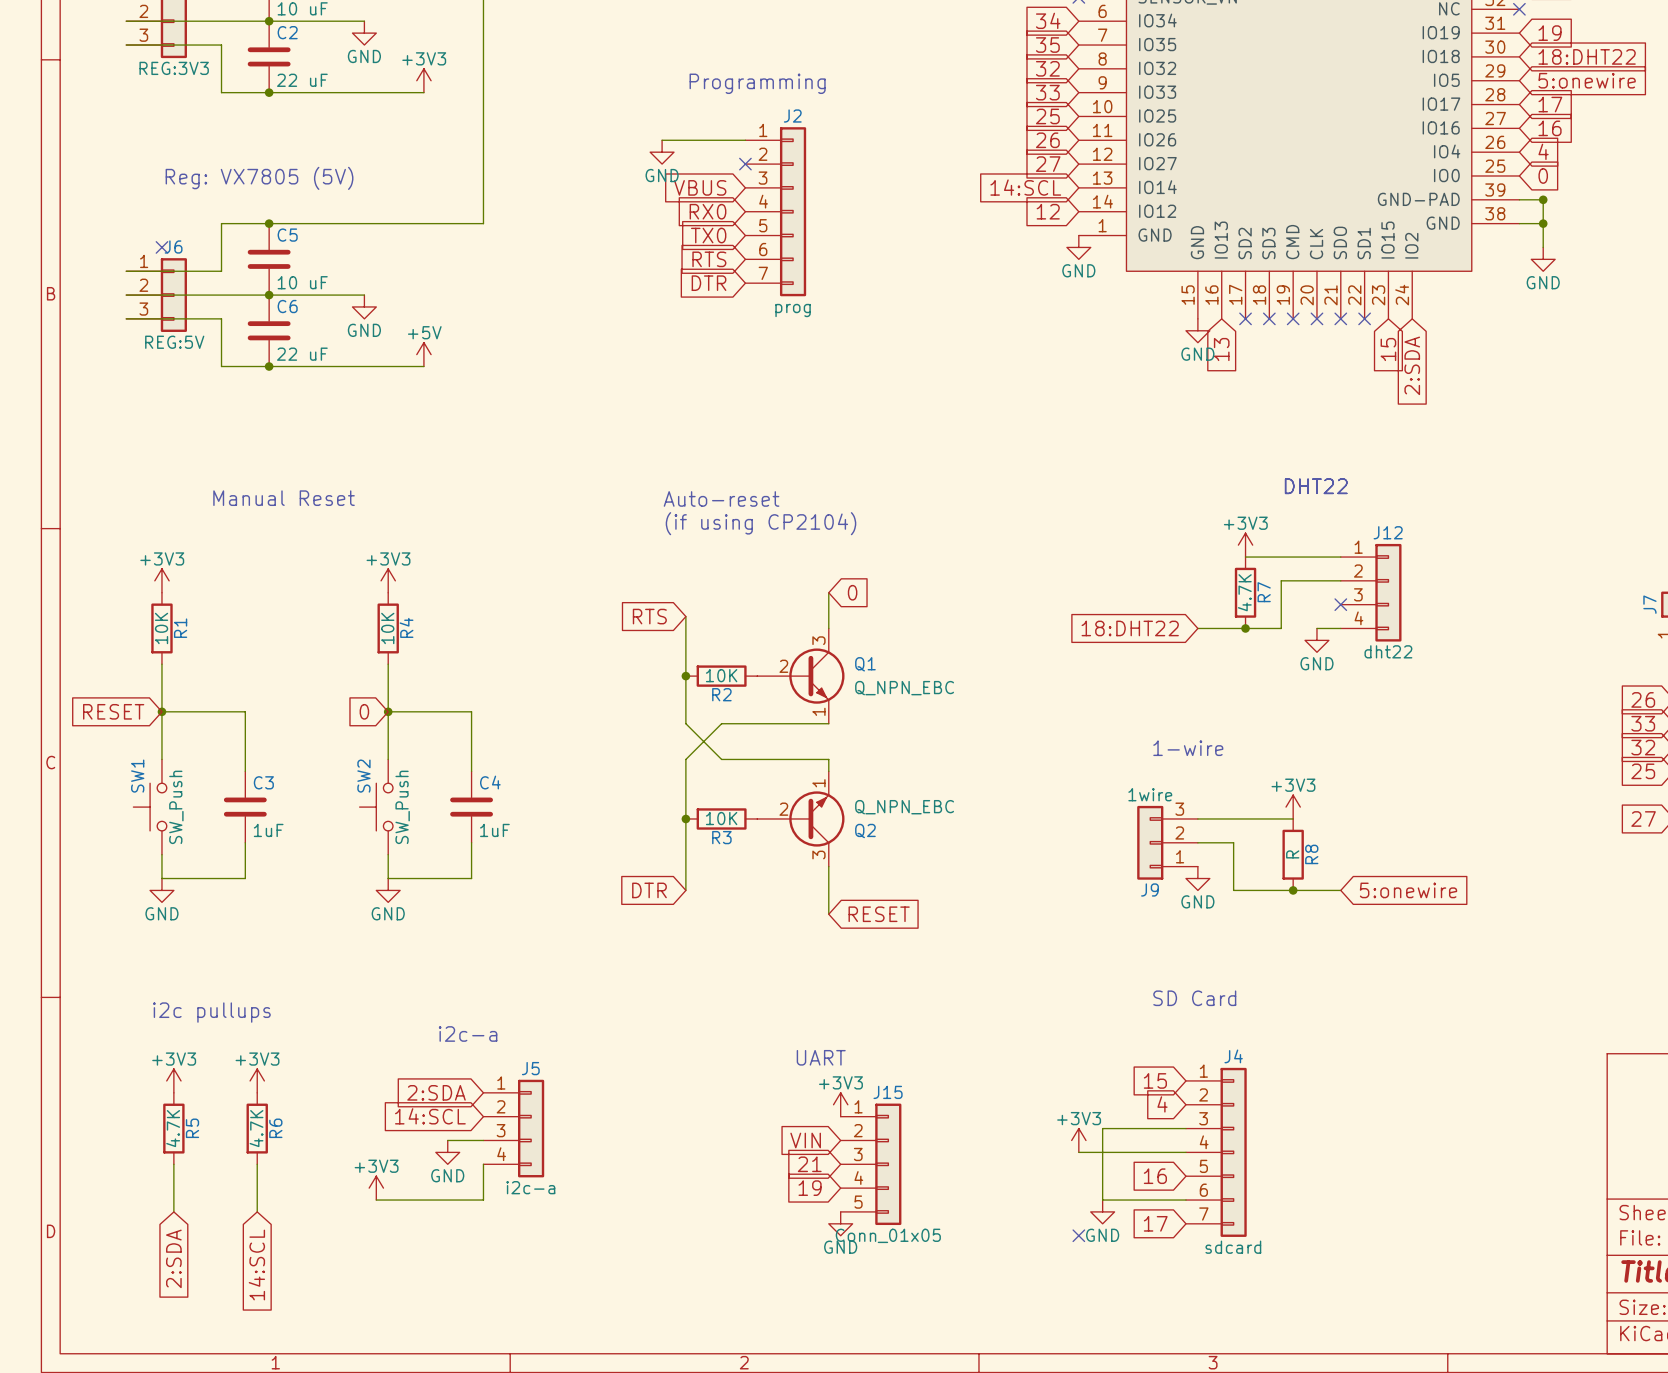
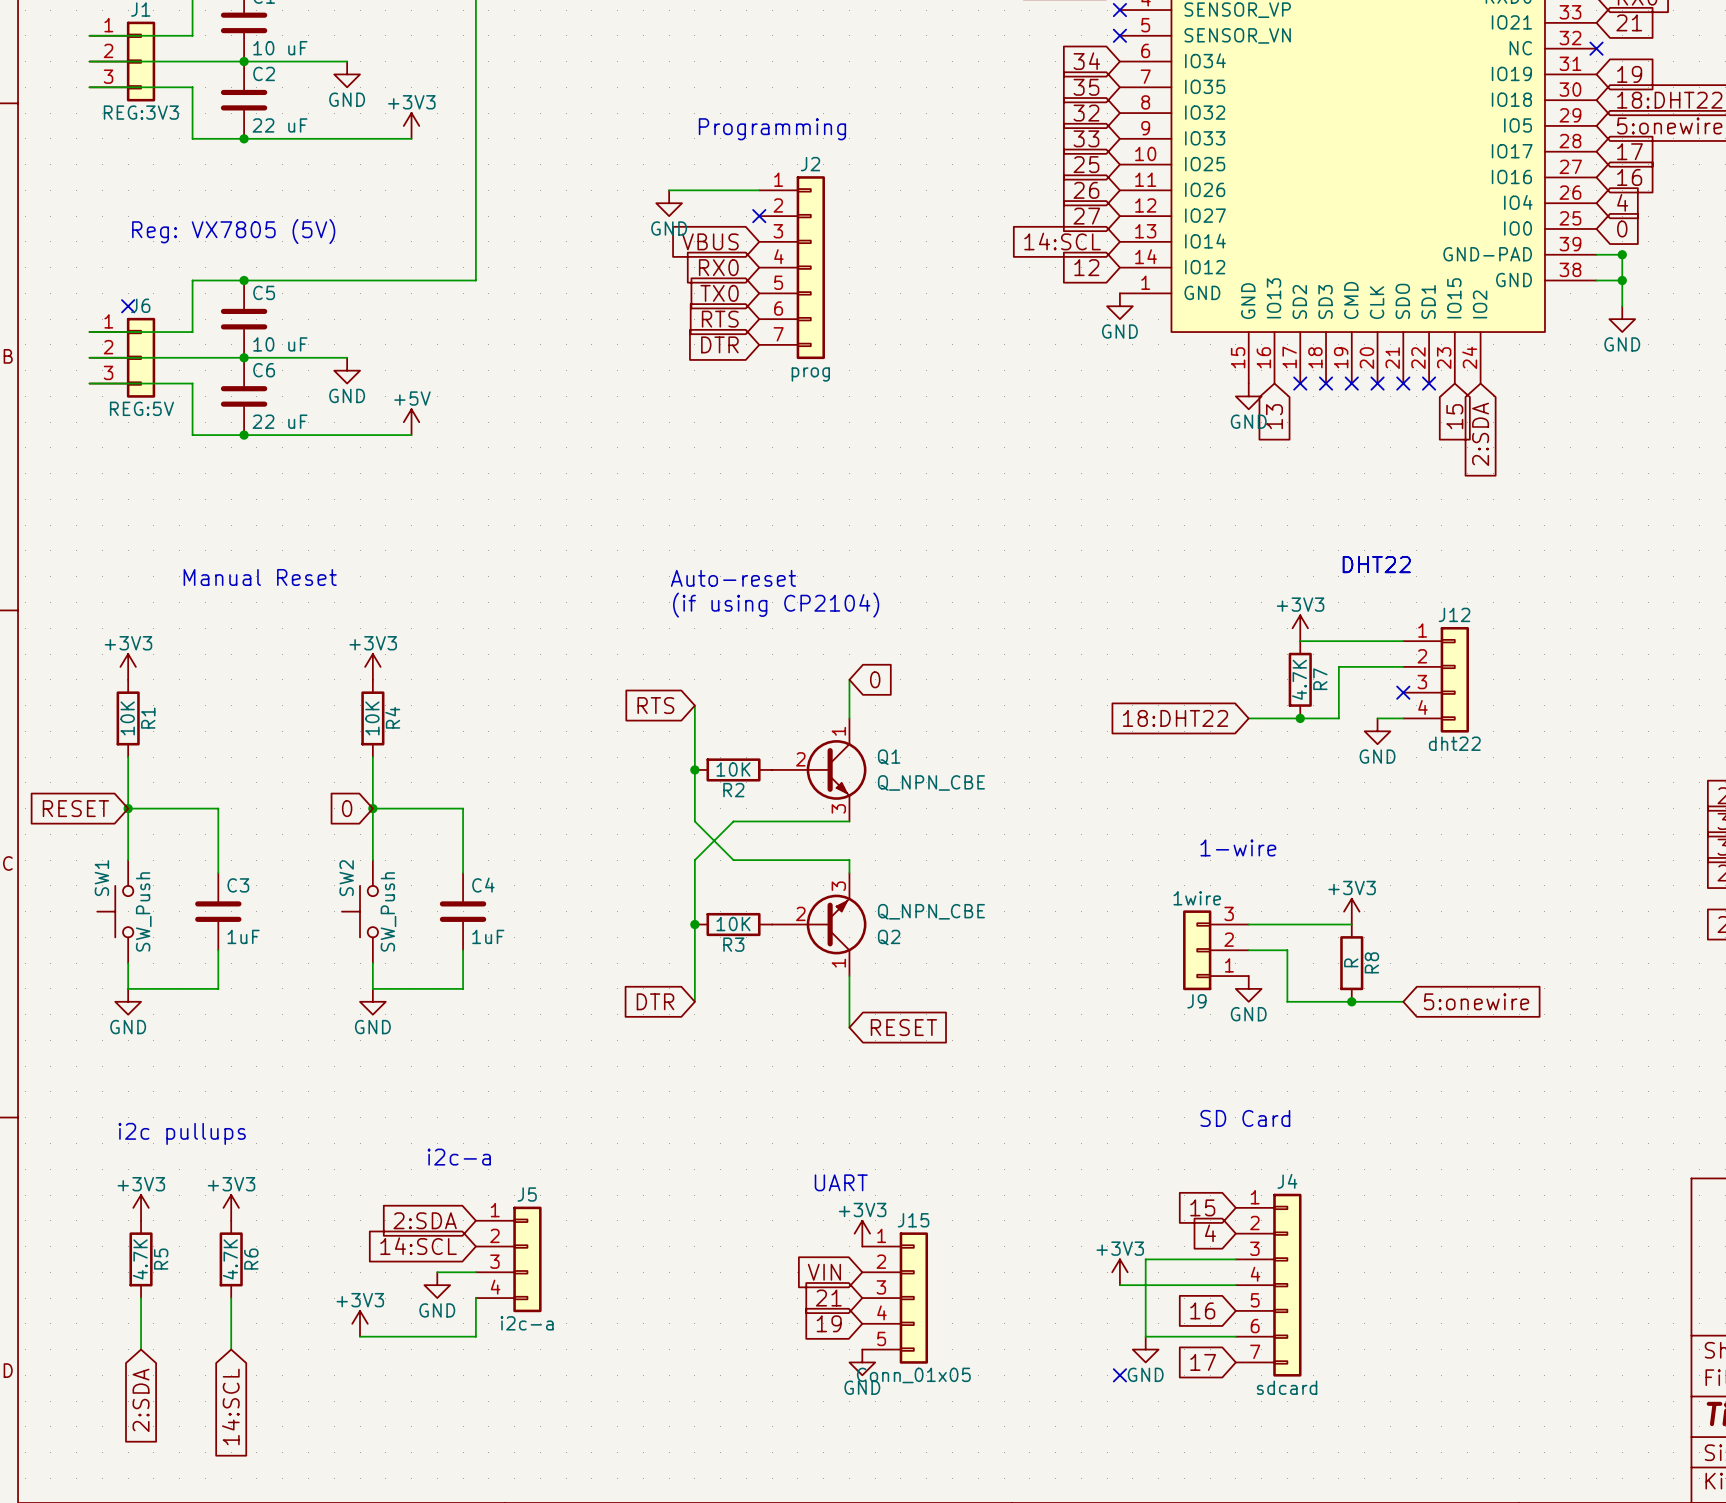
Q1 pin number: 3 (818, 640) -> 1 (838, 731)
Q1 value: Q_NPN_EBC (904, 688) -> Q_NPN_CBE (931, 782)
Q1 pin number: 1 (818, 711) -> 3 (838, 808)
Q2 pin number: 1 (818, 783) -> 3 (838, 886)
Q2 value: Q_NPN_EBC (904, 807) -> Q_NPN_CBE (931, 911)
Q2 pin number: 3 (818, 854) -> 1 (838, 963)

